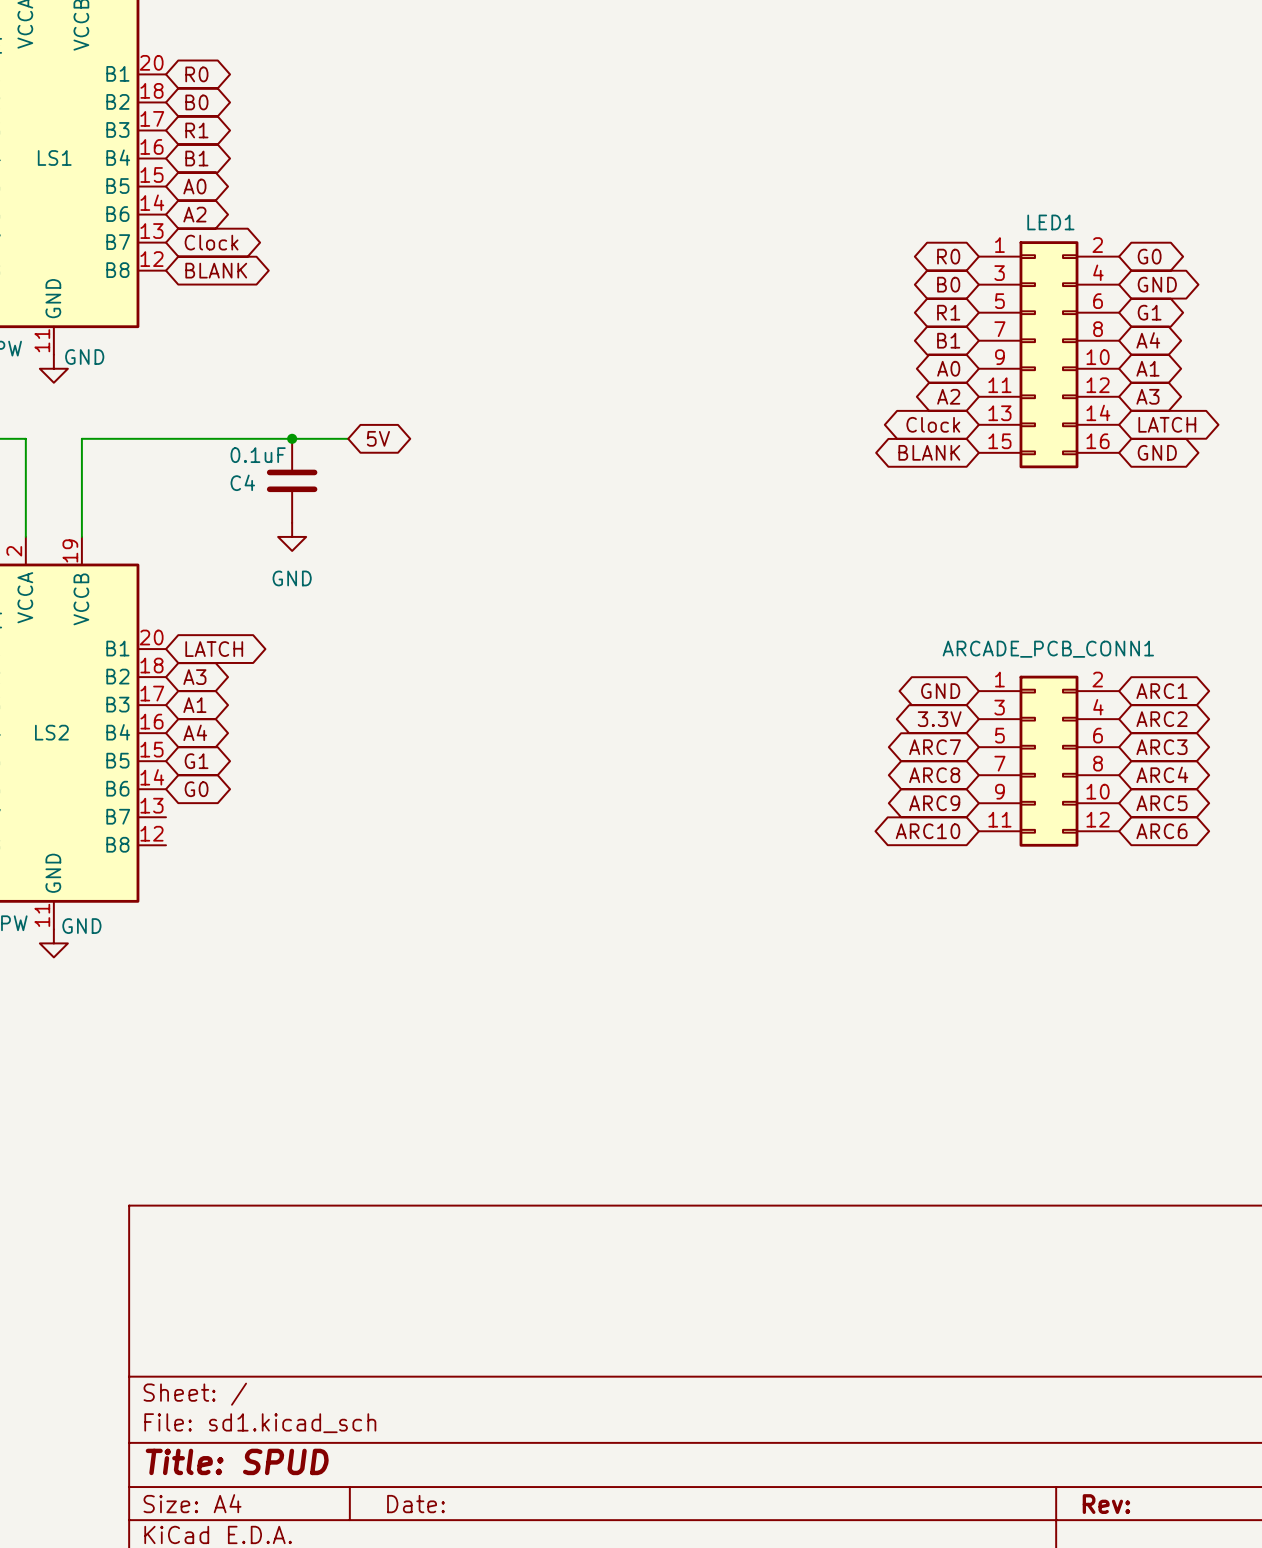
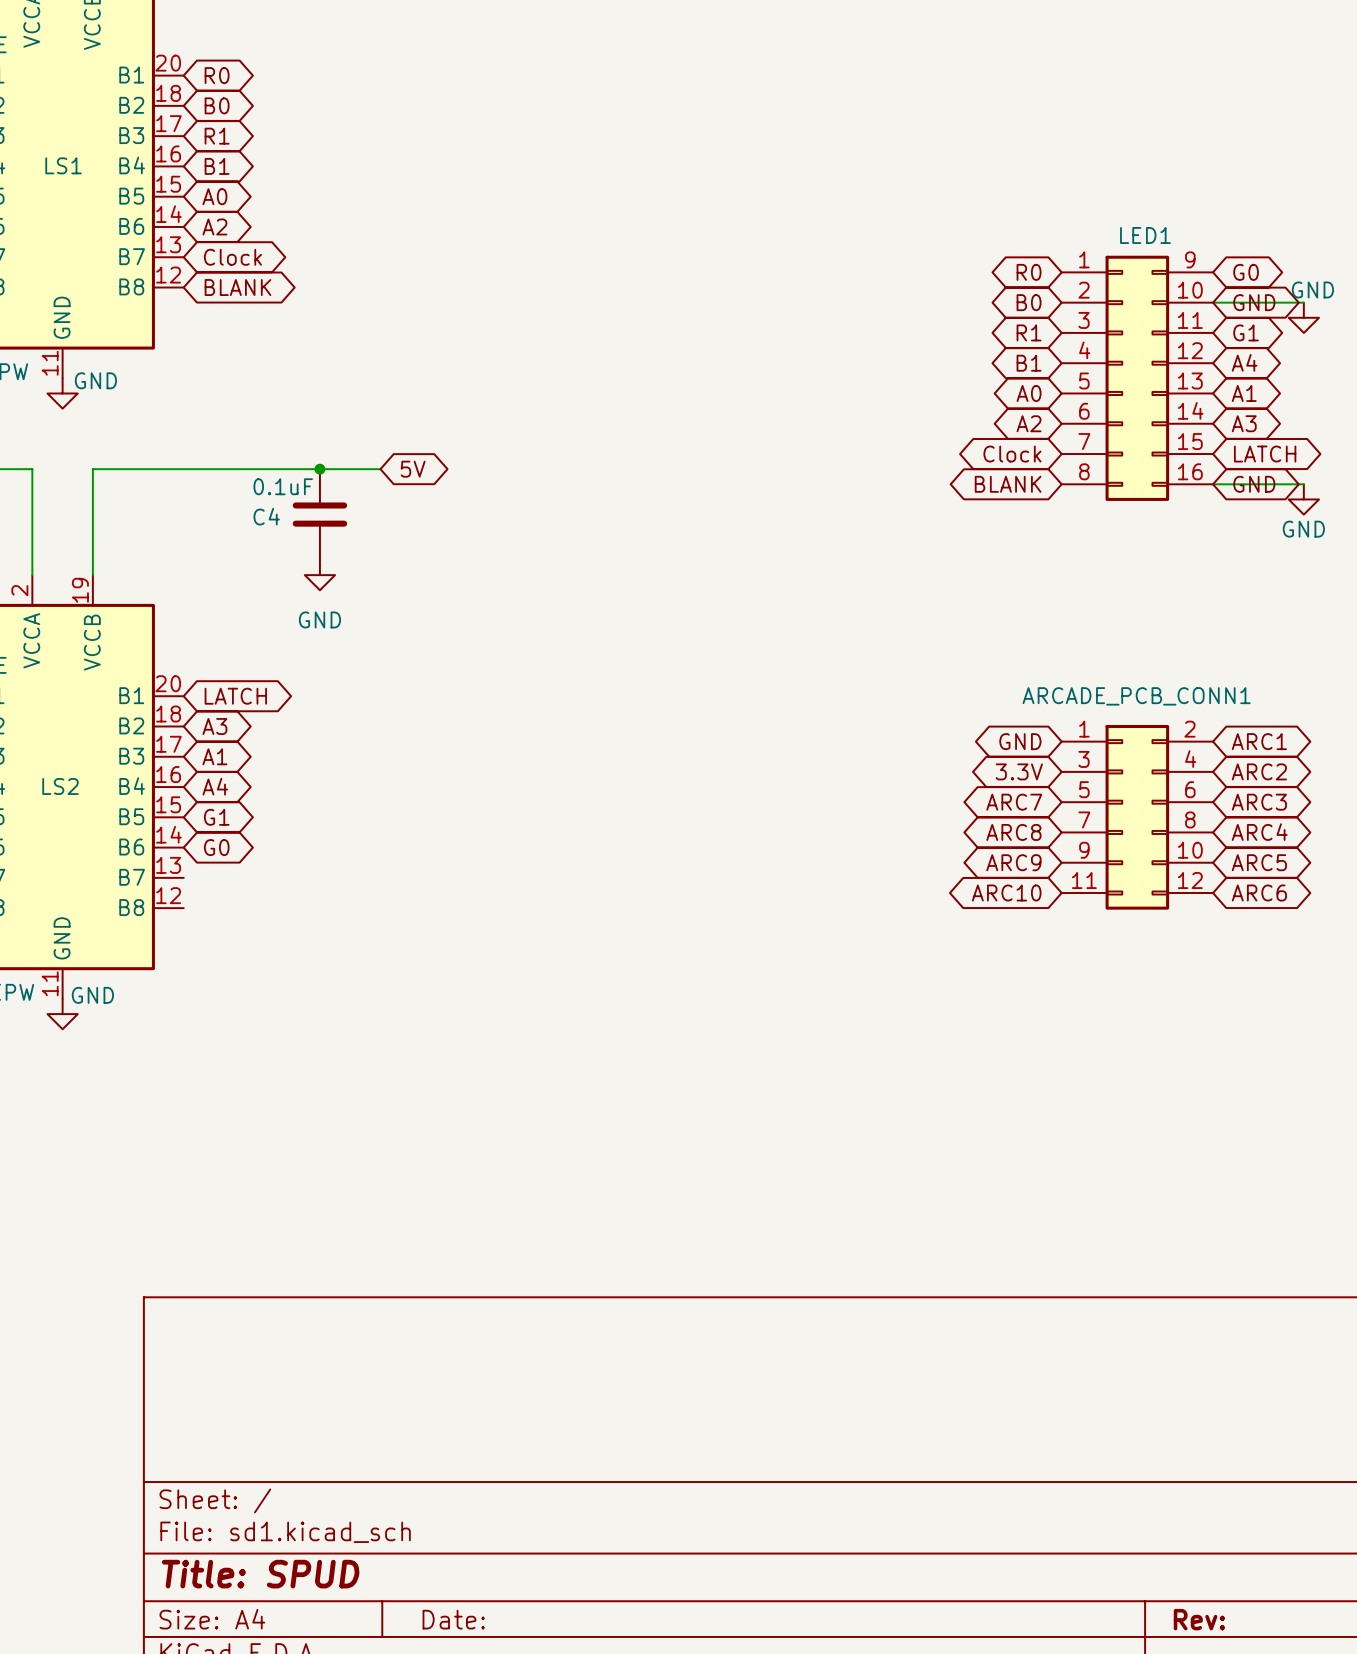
LED1 symbol: [978, 241, 1120, 469] -> [1061, 255, 1214, 501]
wire: none -> (1213, 302) (1303, 302)
power symbol: none -> GND (1303, 317)
wire: none -> (1213, 484) (1303, 484)
power symbol: none -> GND (1303, 499)

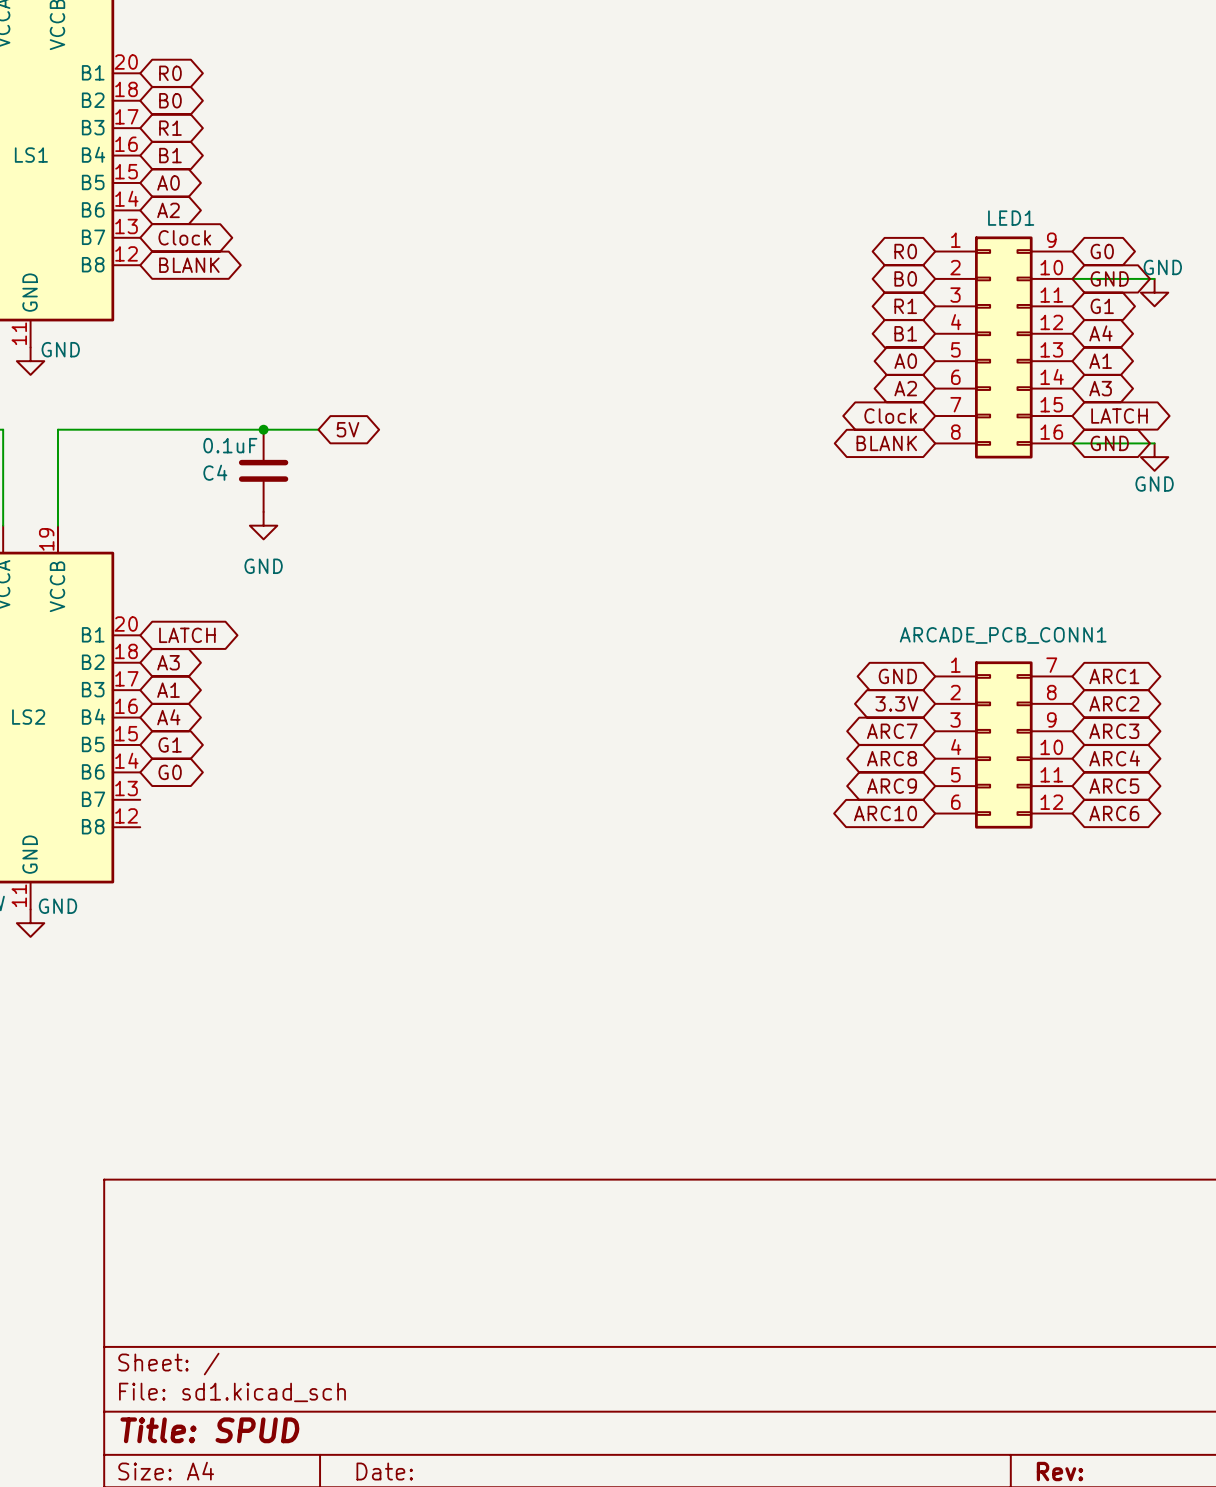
ARCADE_PCB_CONN1 symbol: [1061, 724, 1214, 910] -> [935, 661, 1073, 829]

